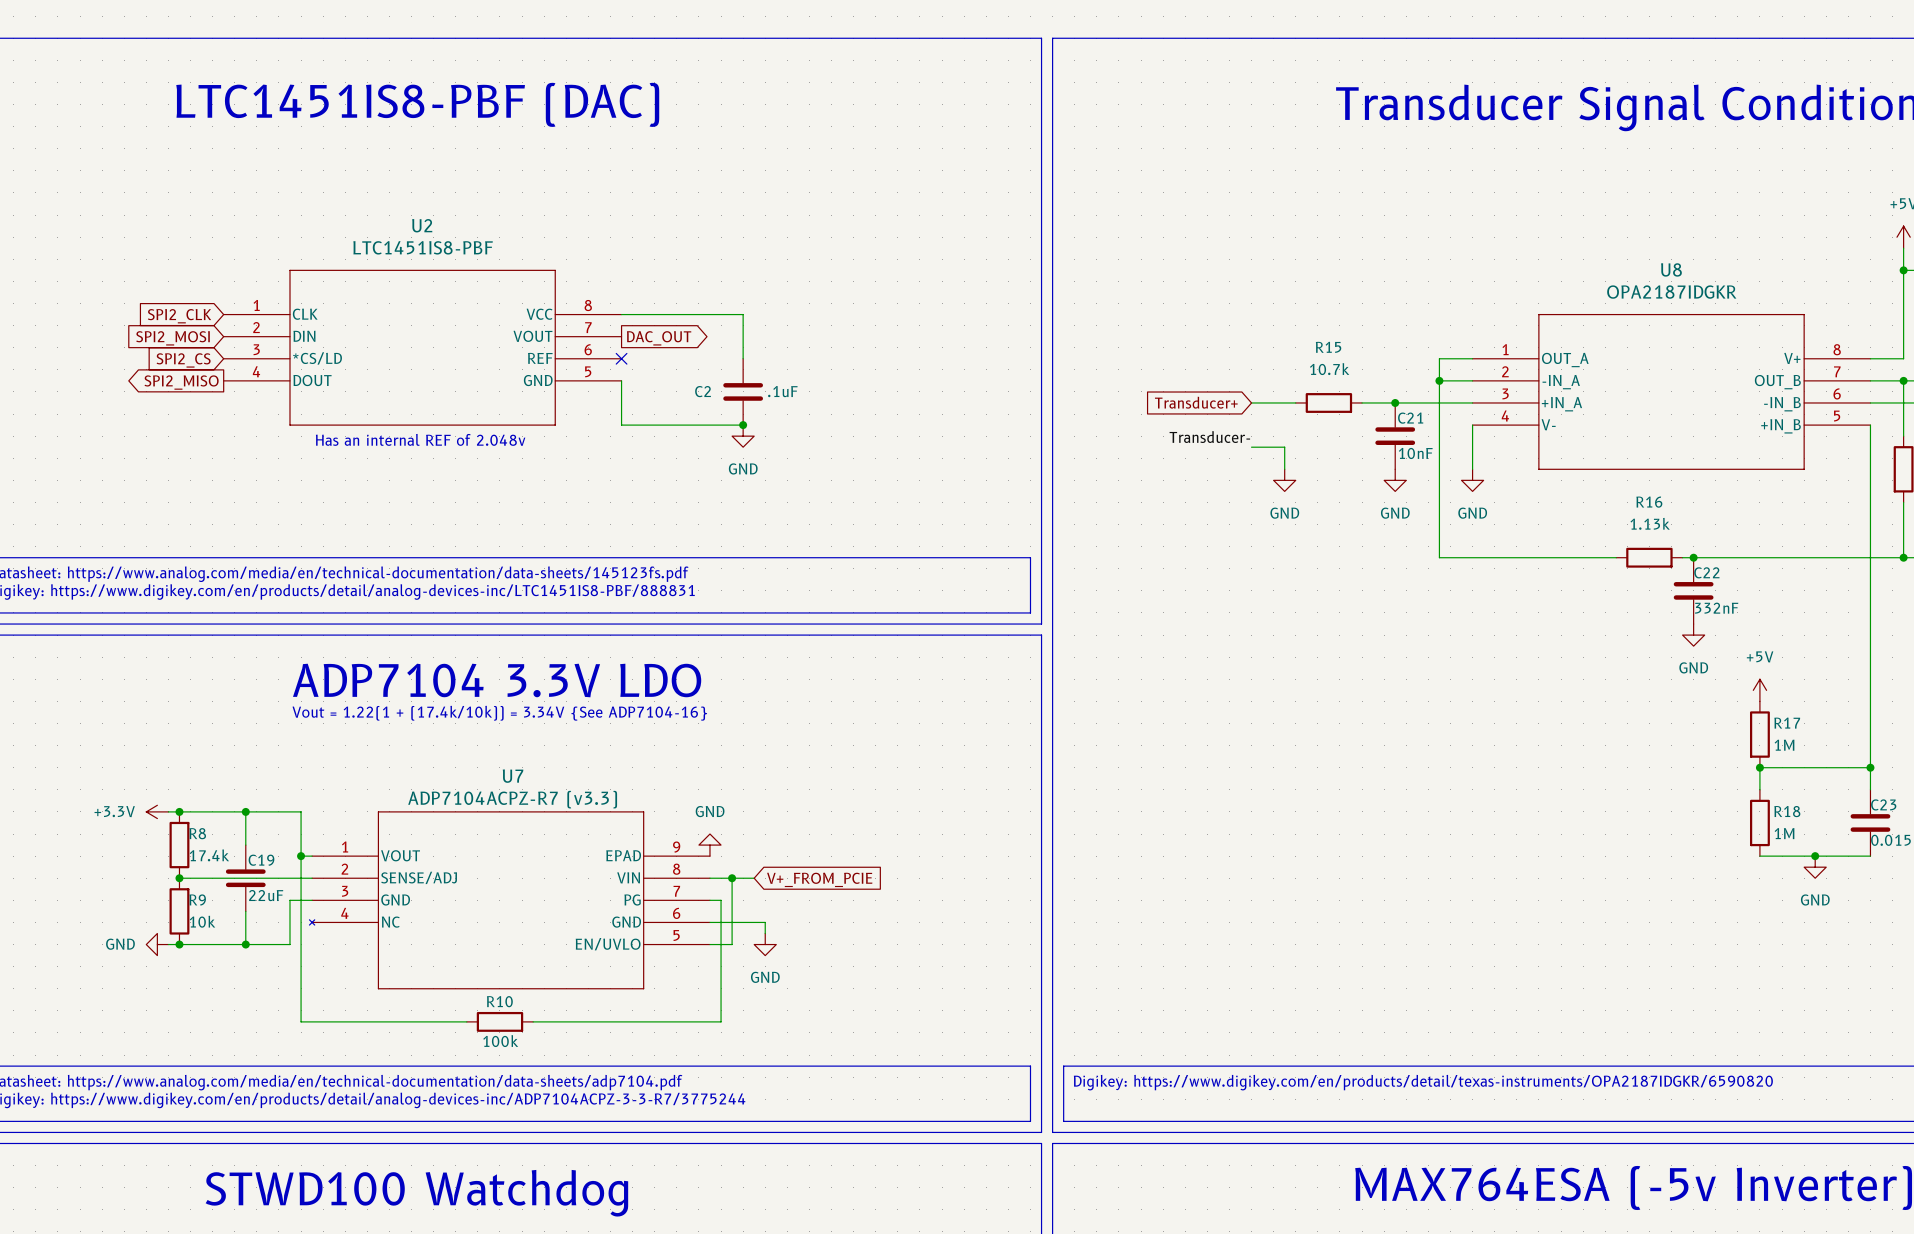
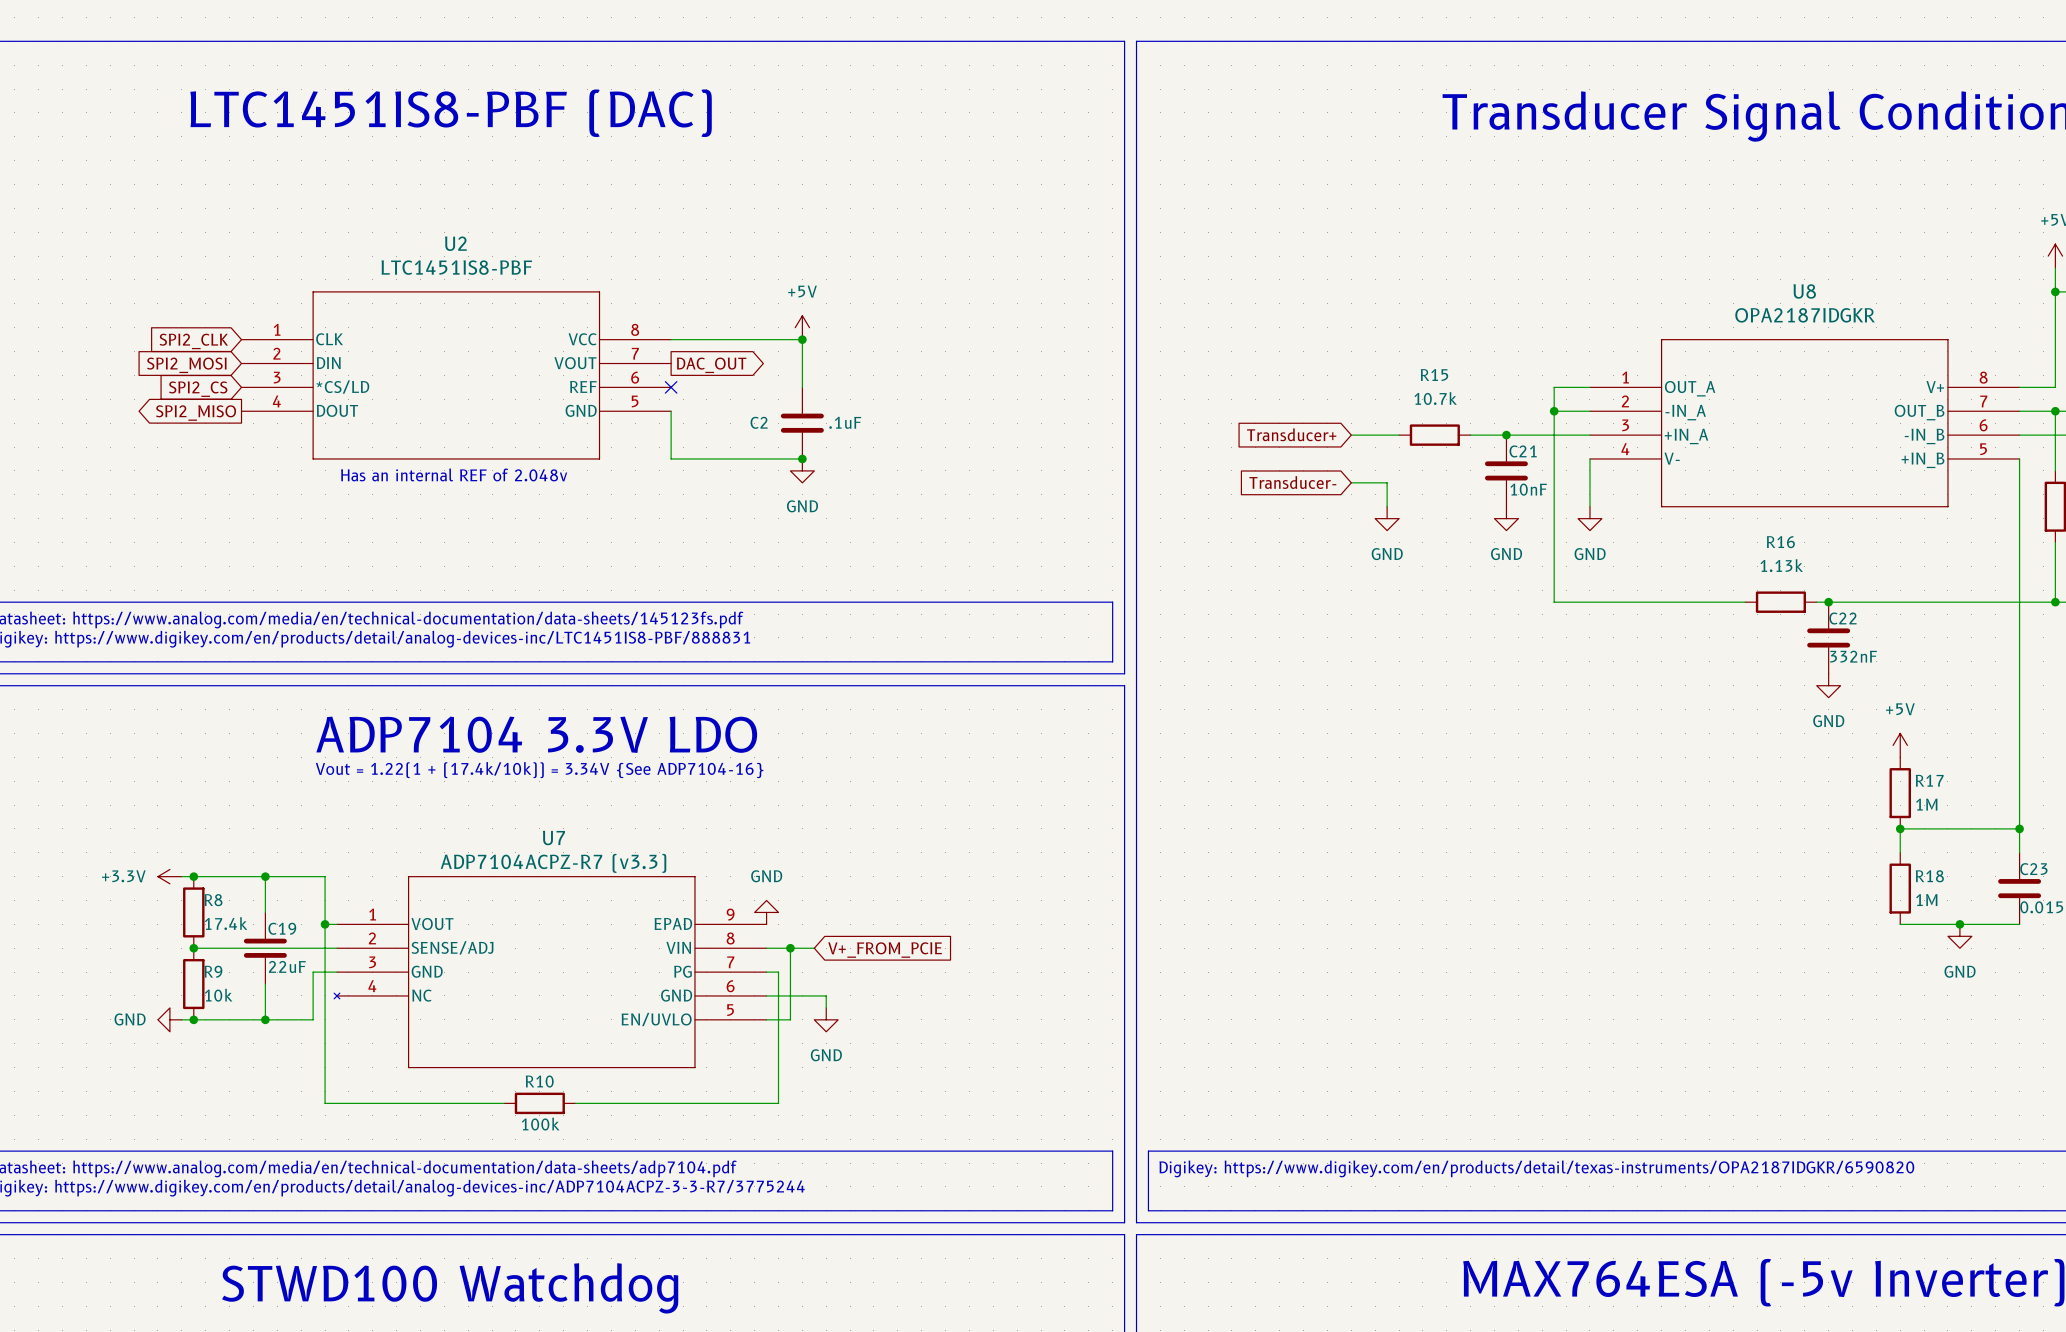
power symbol: none -> +5V (802, 327)
junction: none -> (802, 339)
label: Transducer- (1209, 437) -> none
global label: none -> Transducer- (1292, 482)

